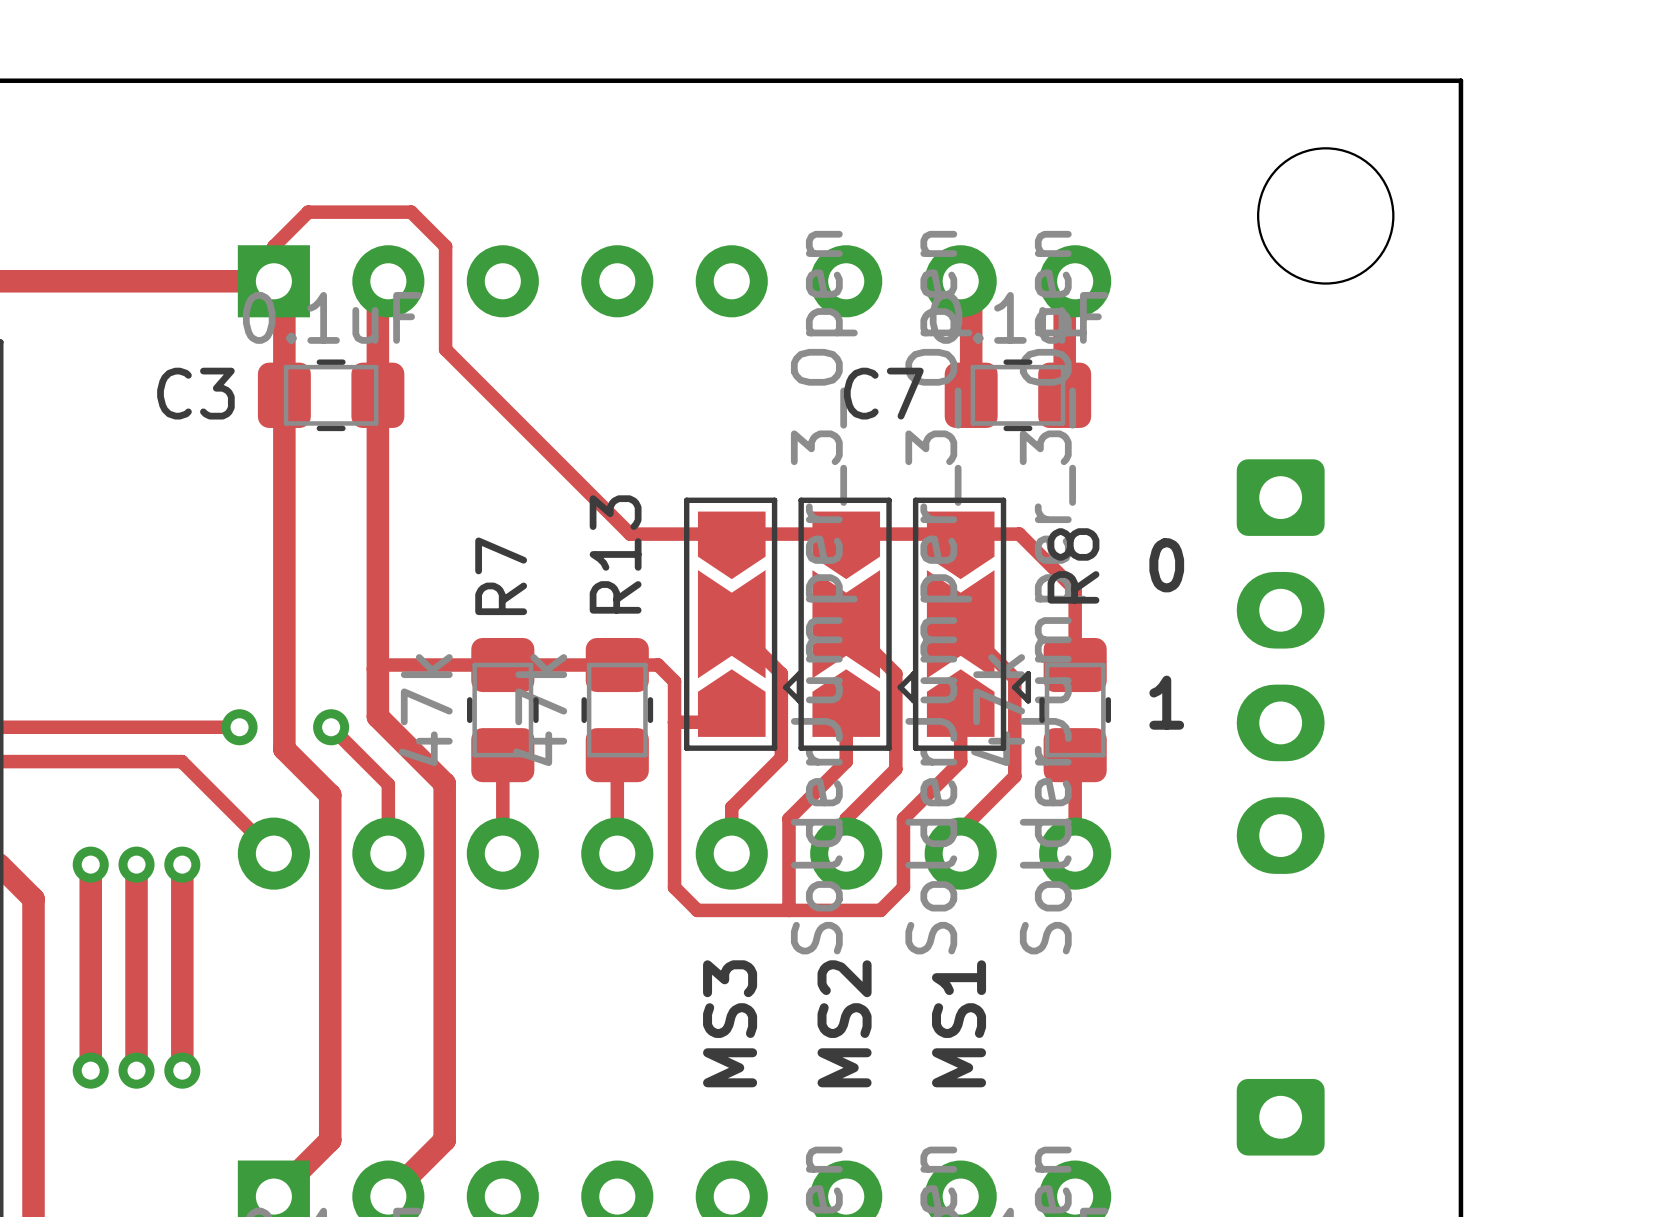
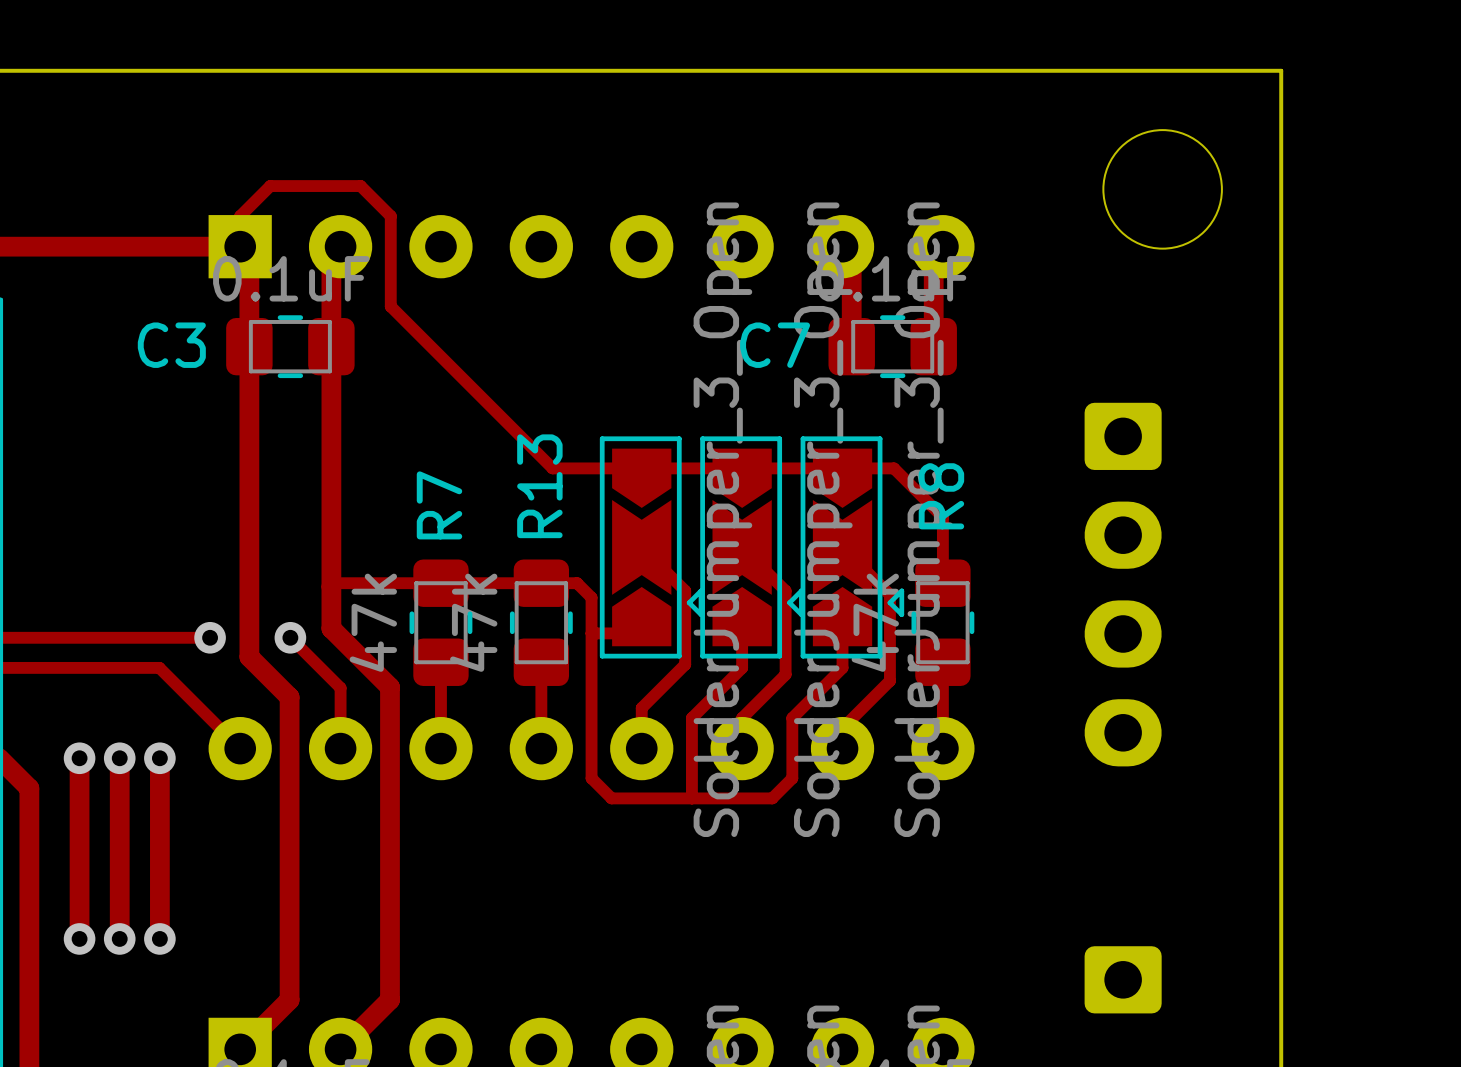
text: 0 (1166, 565) -> none
text: 1 (1166, 702) -> none
text: MS3 (730, 1023) -> none
text: MS2 (844, 1023) -> none
text: MS1 (959, 1023) -> none

